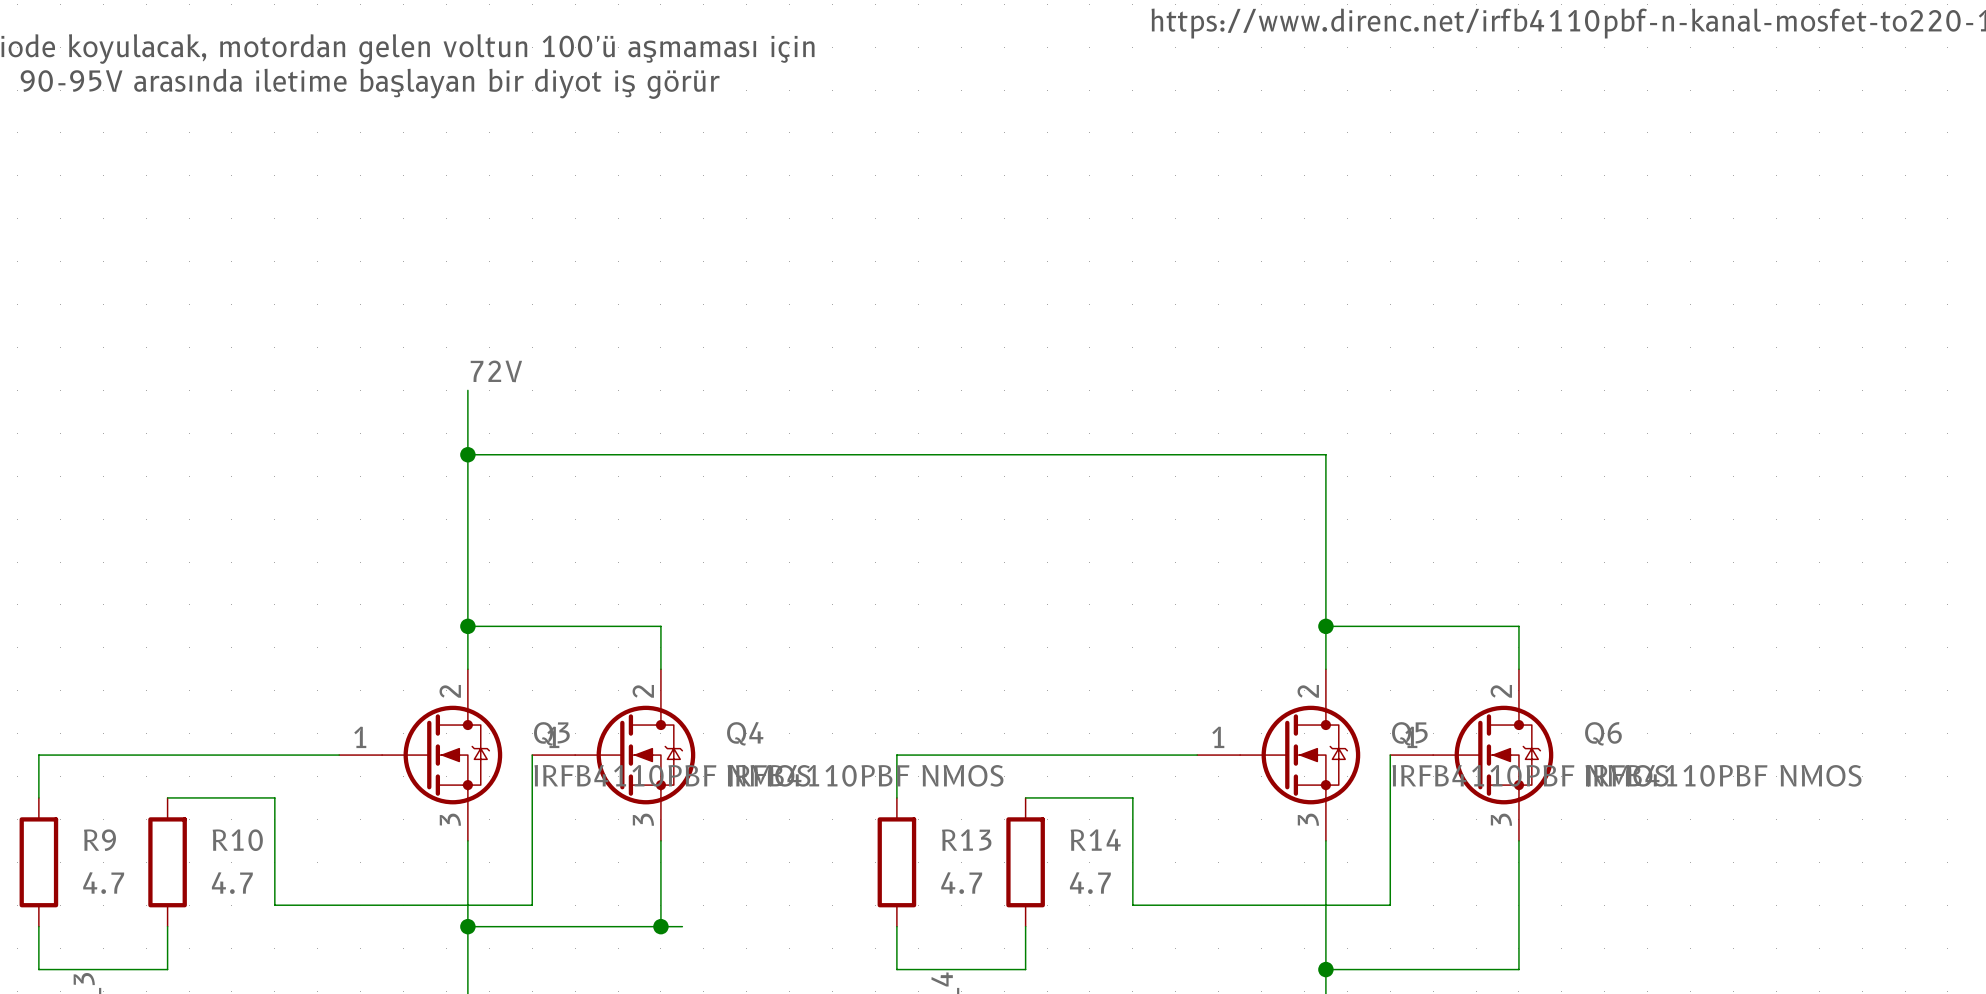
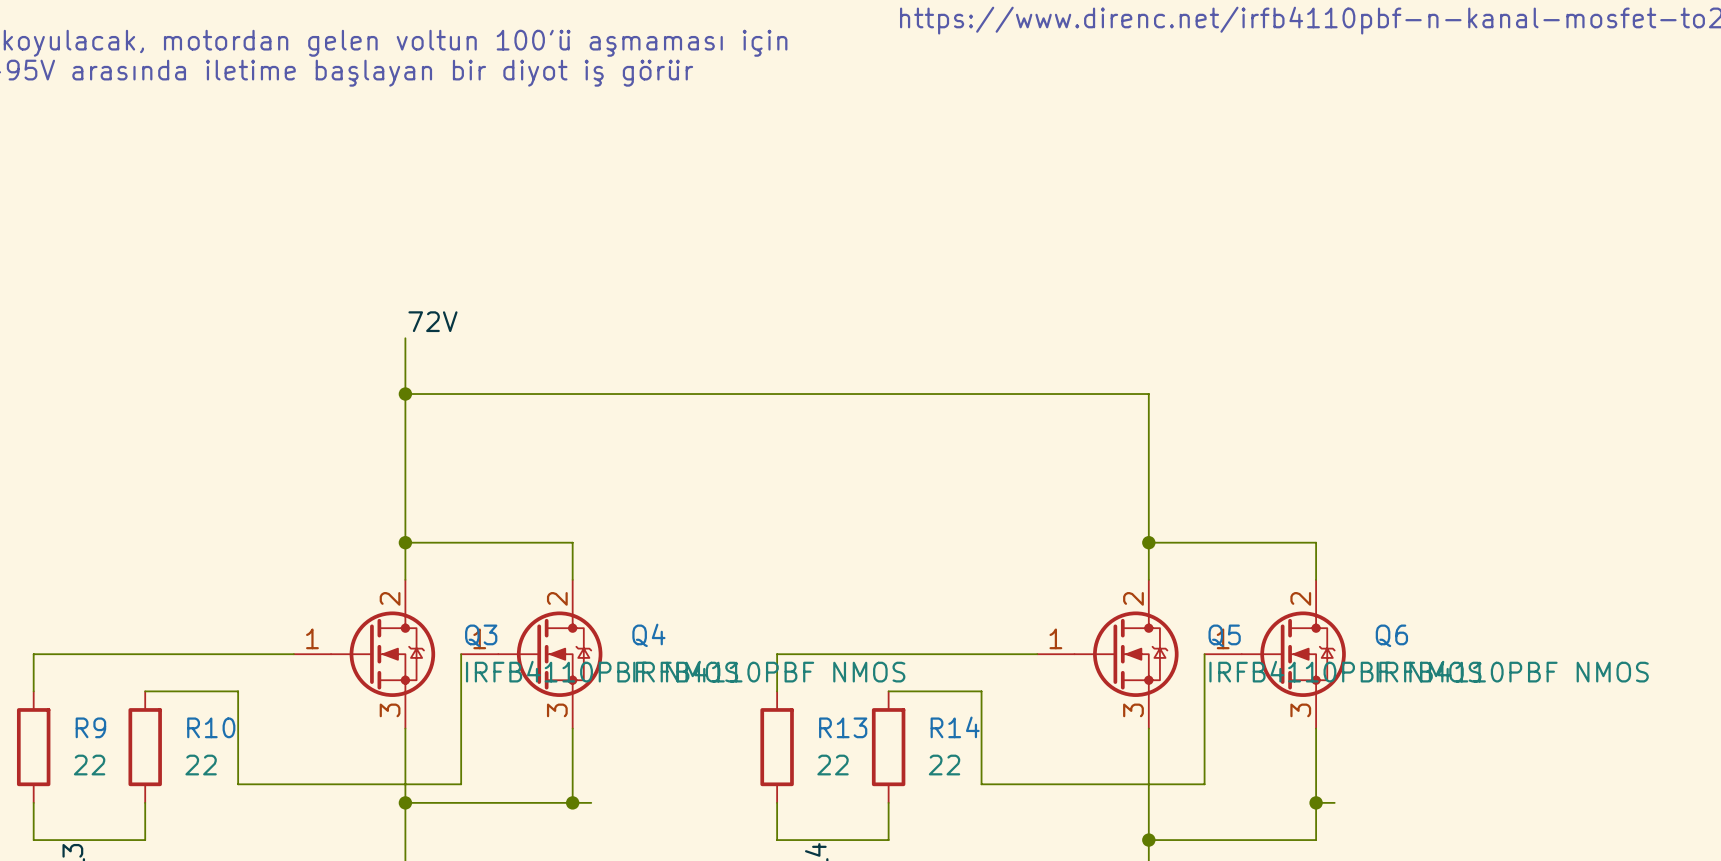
R9 value: 4.7 (103, 883) -> 22 (89, 765)
R10 value: 4.7 (232, 883) -> 22 (201, 765)
R13 value: 4.7 (961, 883) -> 22 (833, 765)
R14 value: 4.7 (1090, 883) -> 22 (944, 765)
wire: none -> (1316, 802) (1334, 802)
junction: none -> (1316, 802)

